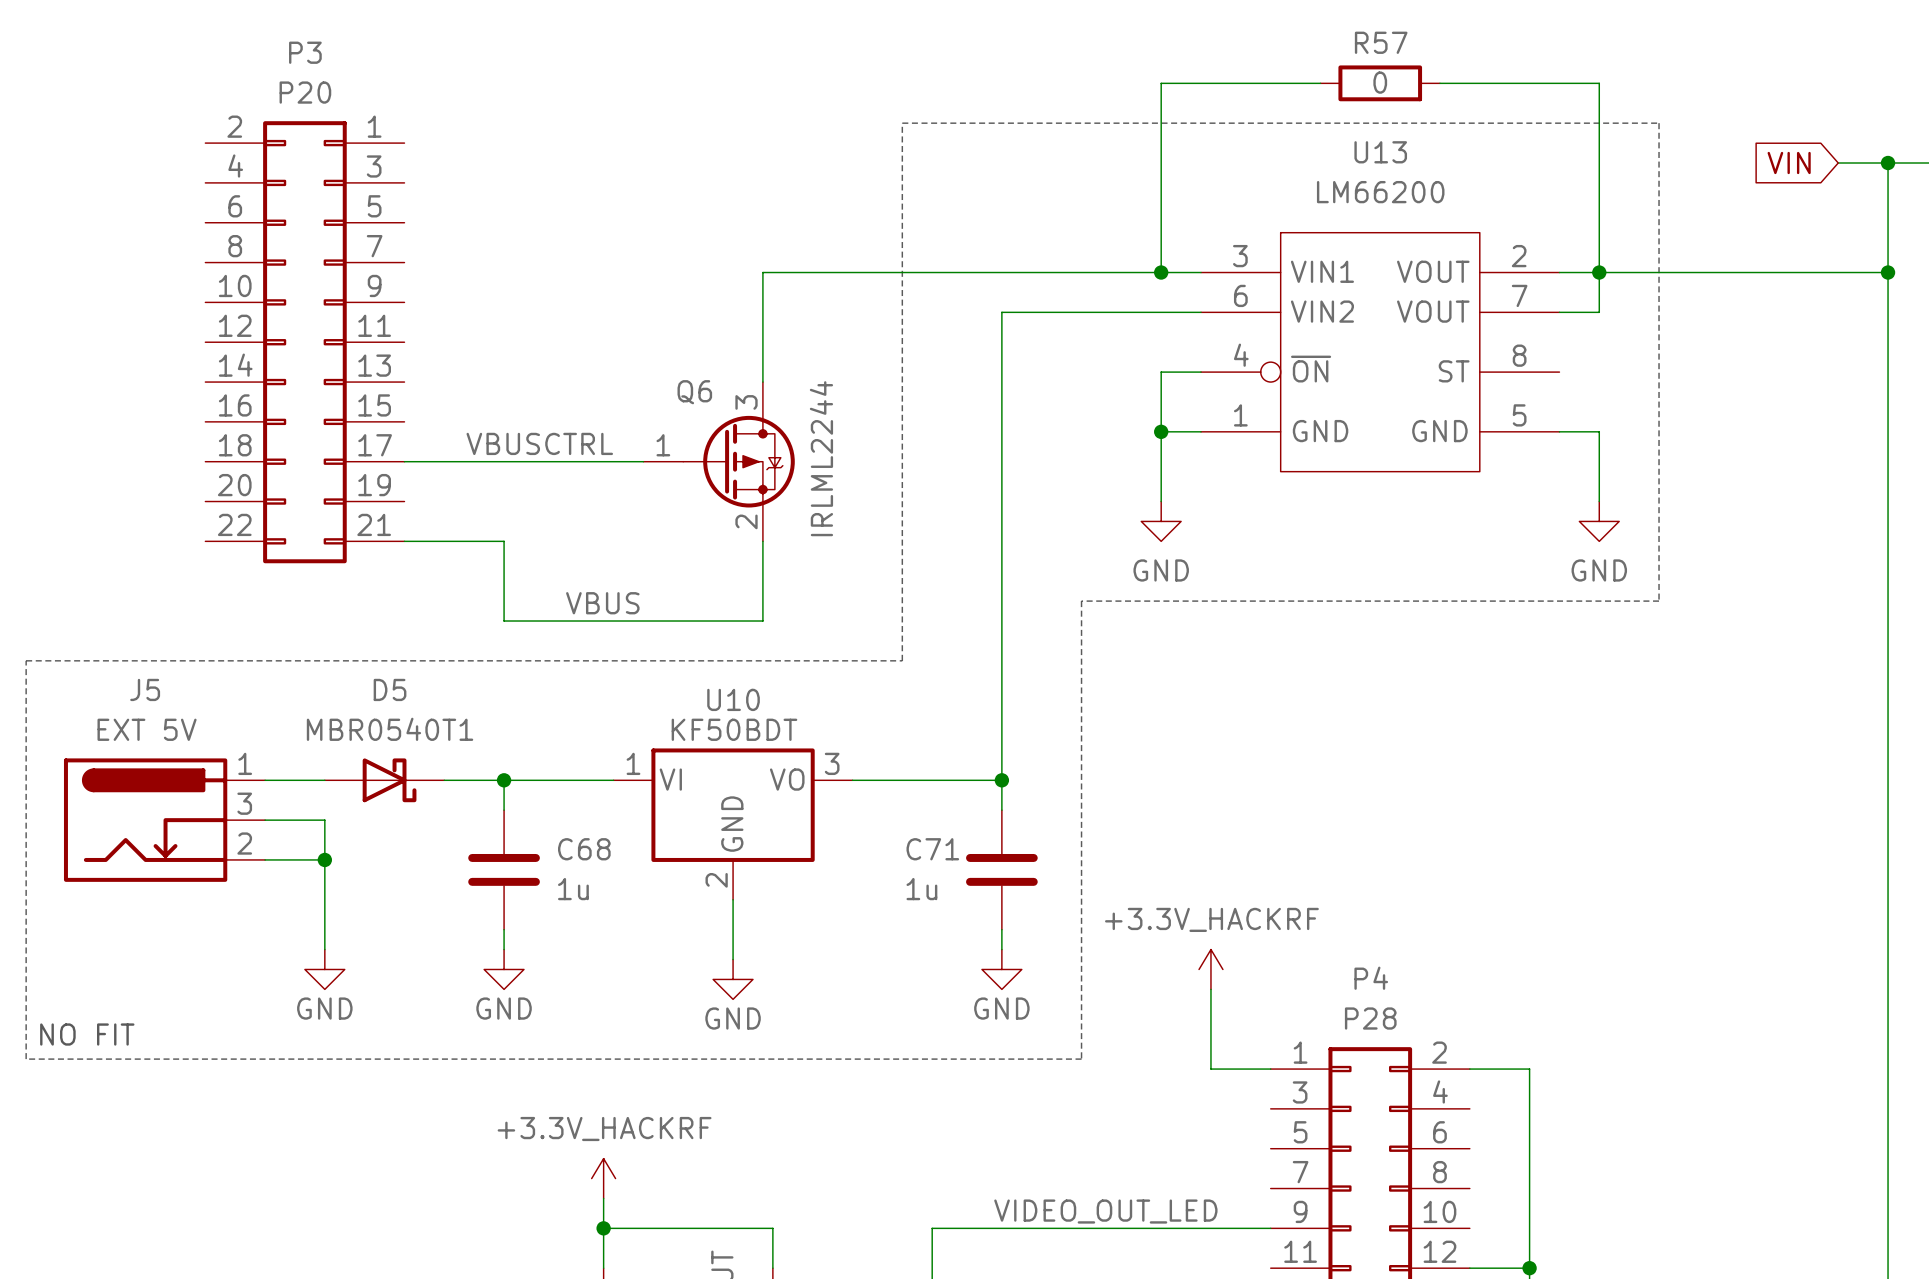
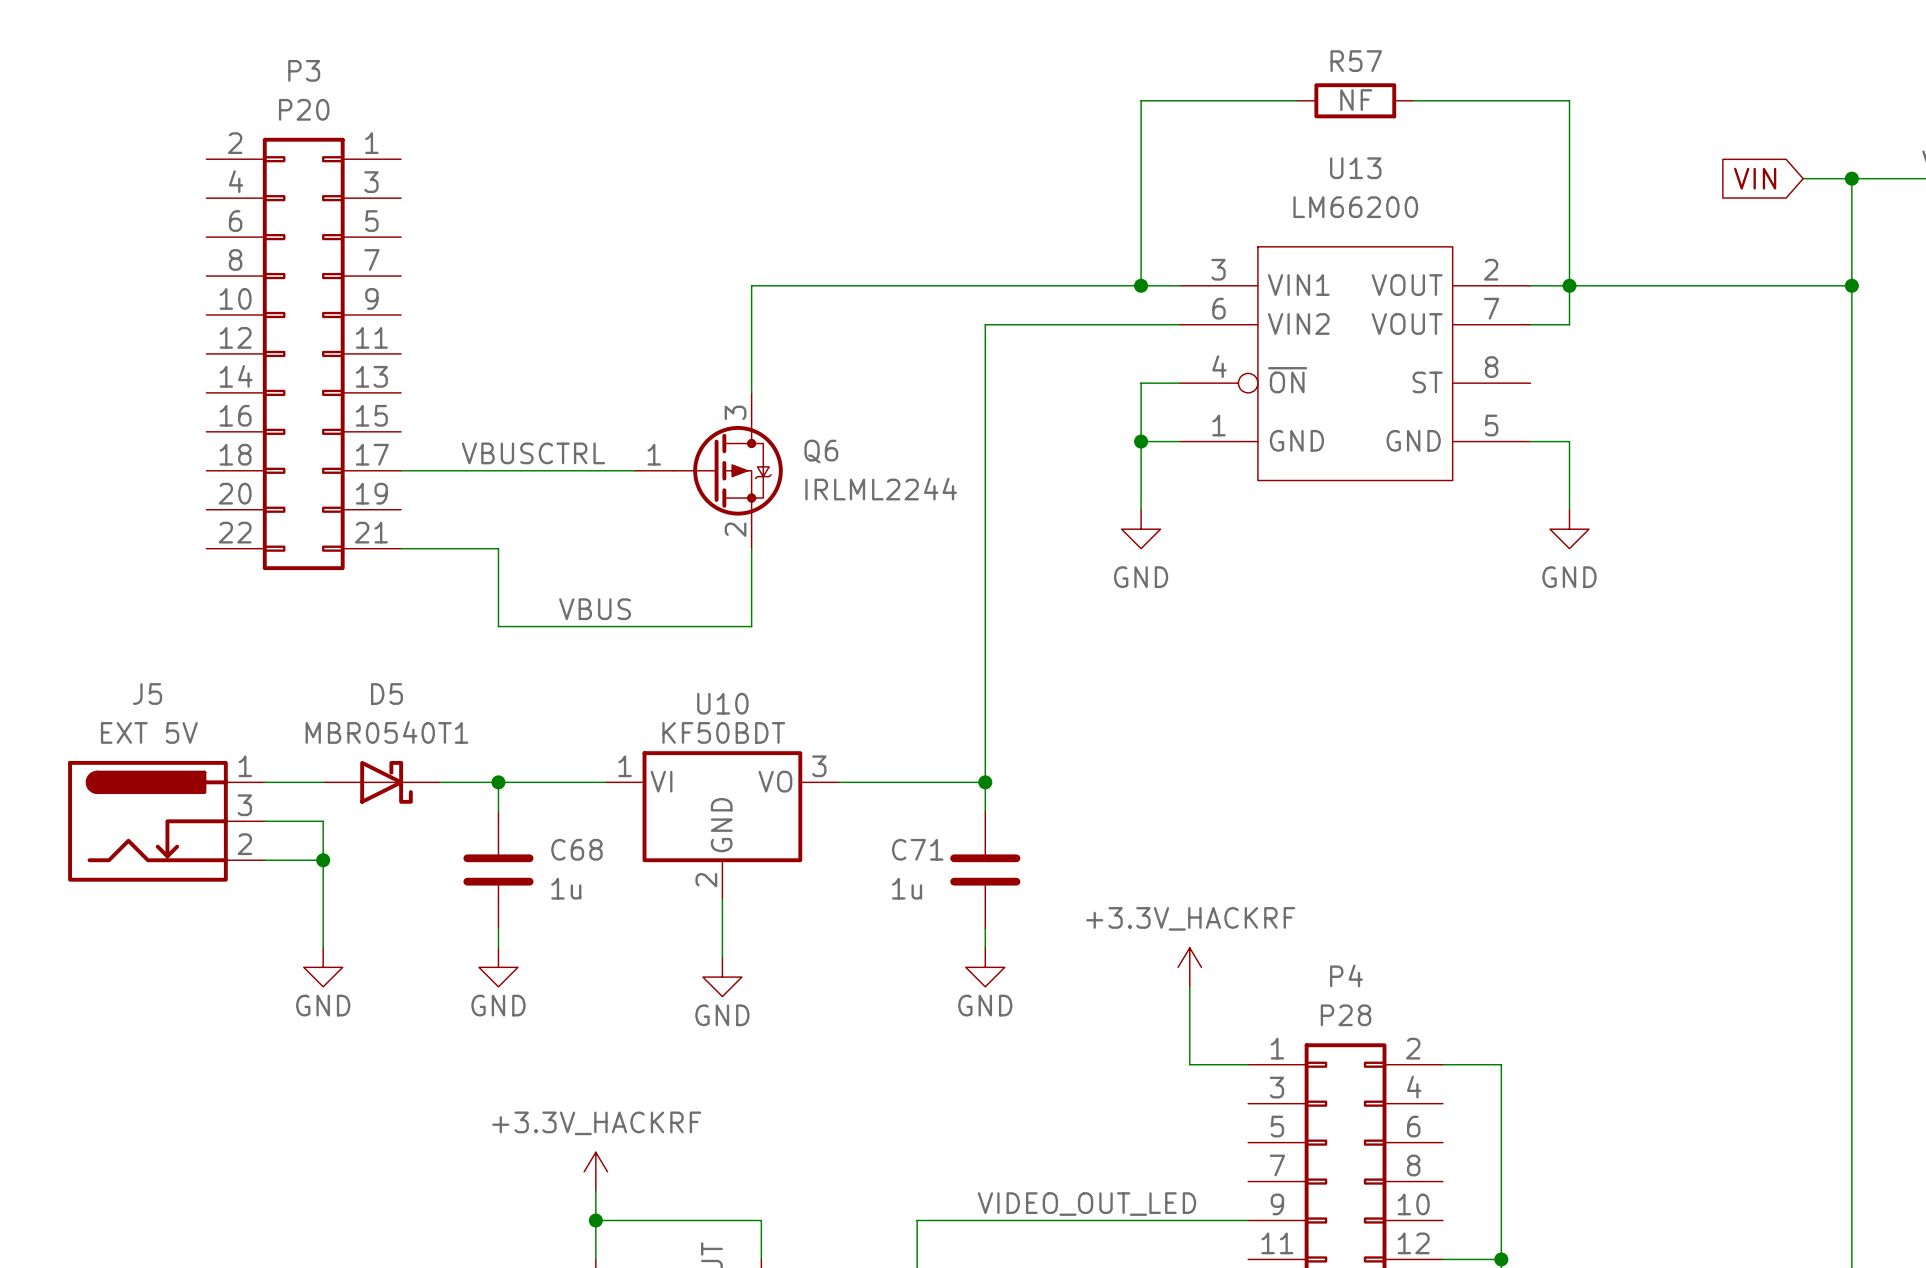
R57 value: 0 (1380, 82) -> NF (1356, 100)
line: (902, 123) (902, 660) (26, 660) (26, 1059) (1081, 1059) (1081, 601) (1659, 601) (1659, 123) (902, 123) -> none
Q6 name position: Q6 (694, 392) -> Q6 (821, 451)
Q6 value rotation: 0° (821, 458) -> 90° clockwise (881, 489)
text: NO FIT (87, 1034) -> none

